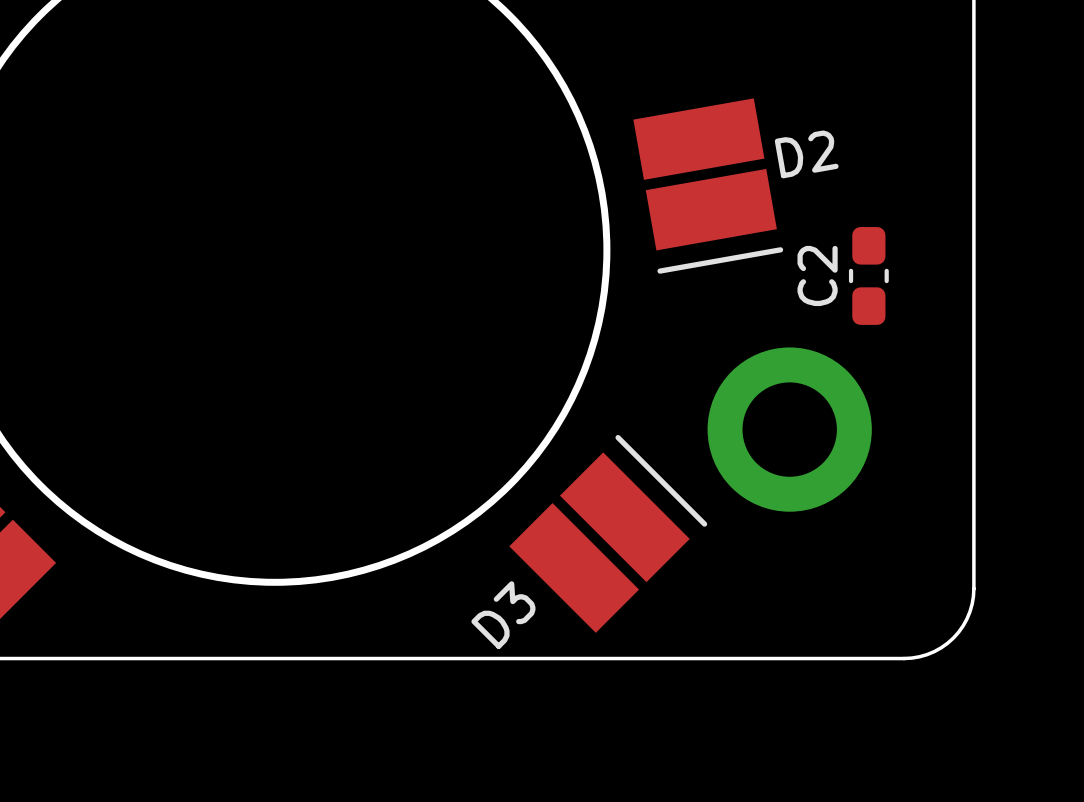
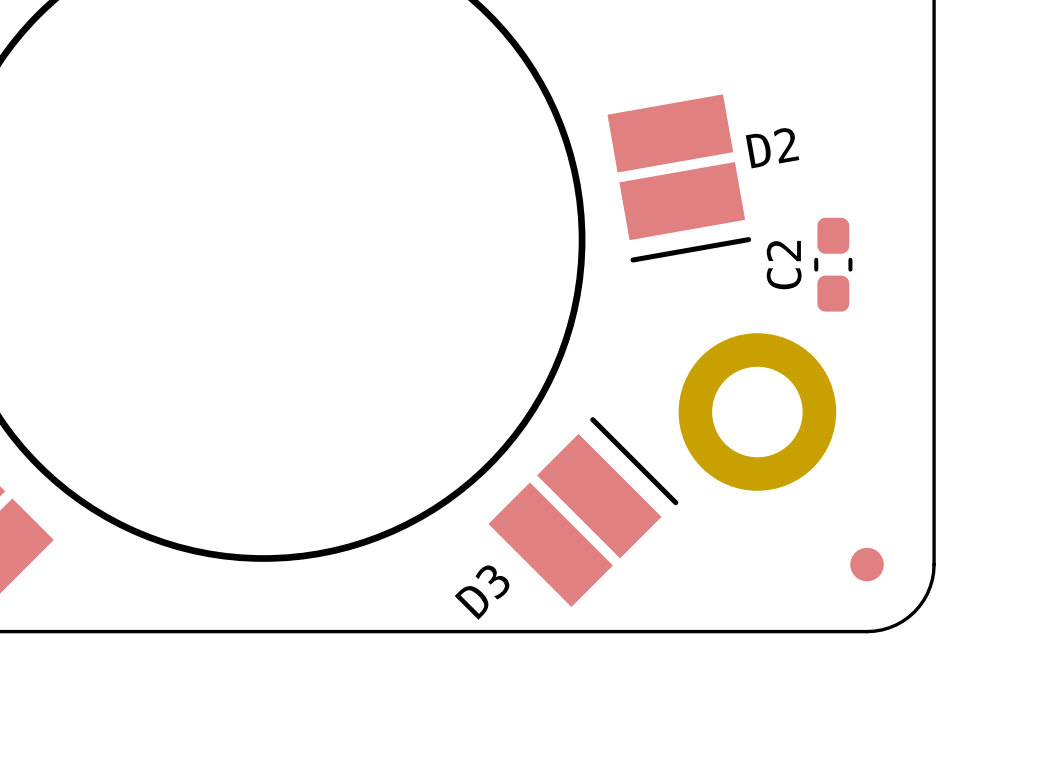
part: none -> (867, 564)

